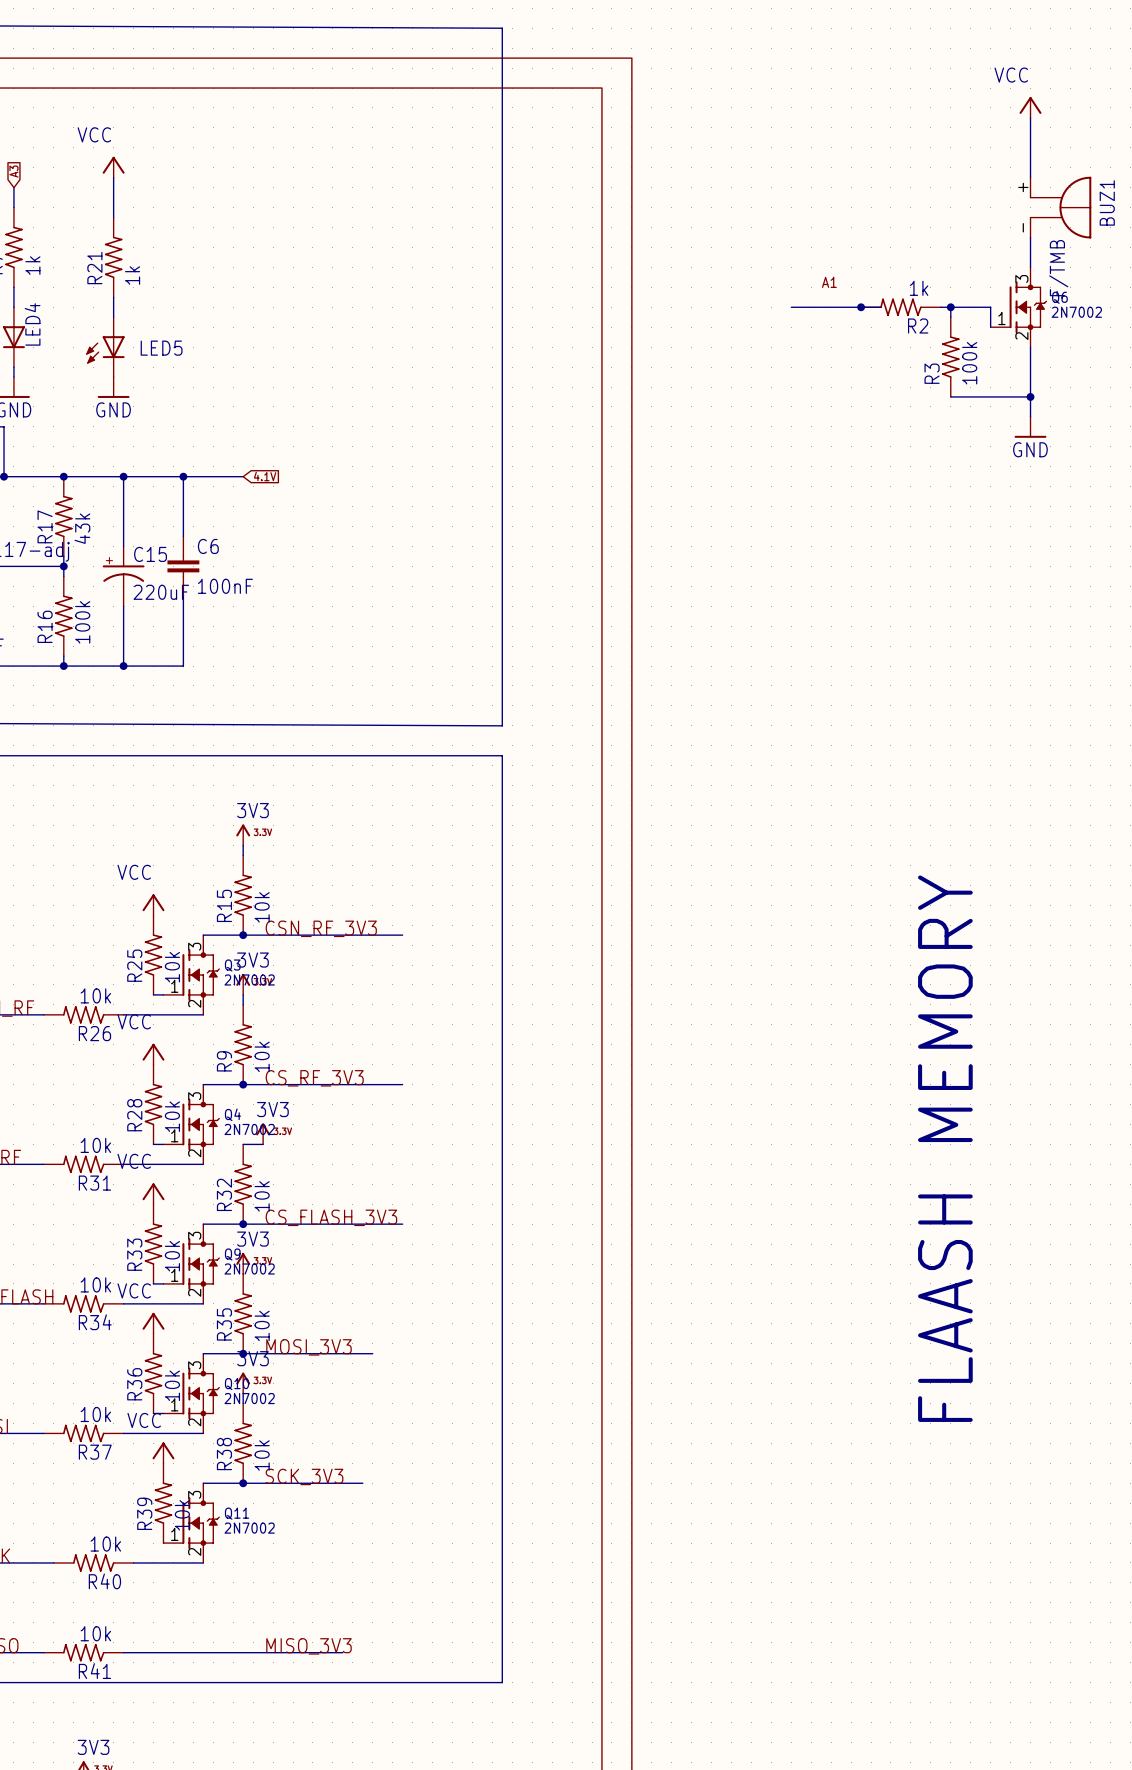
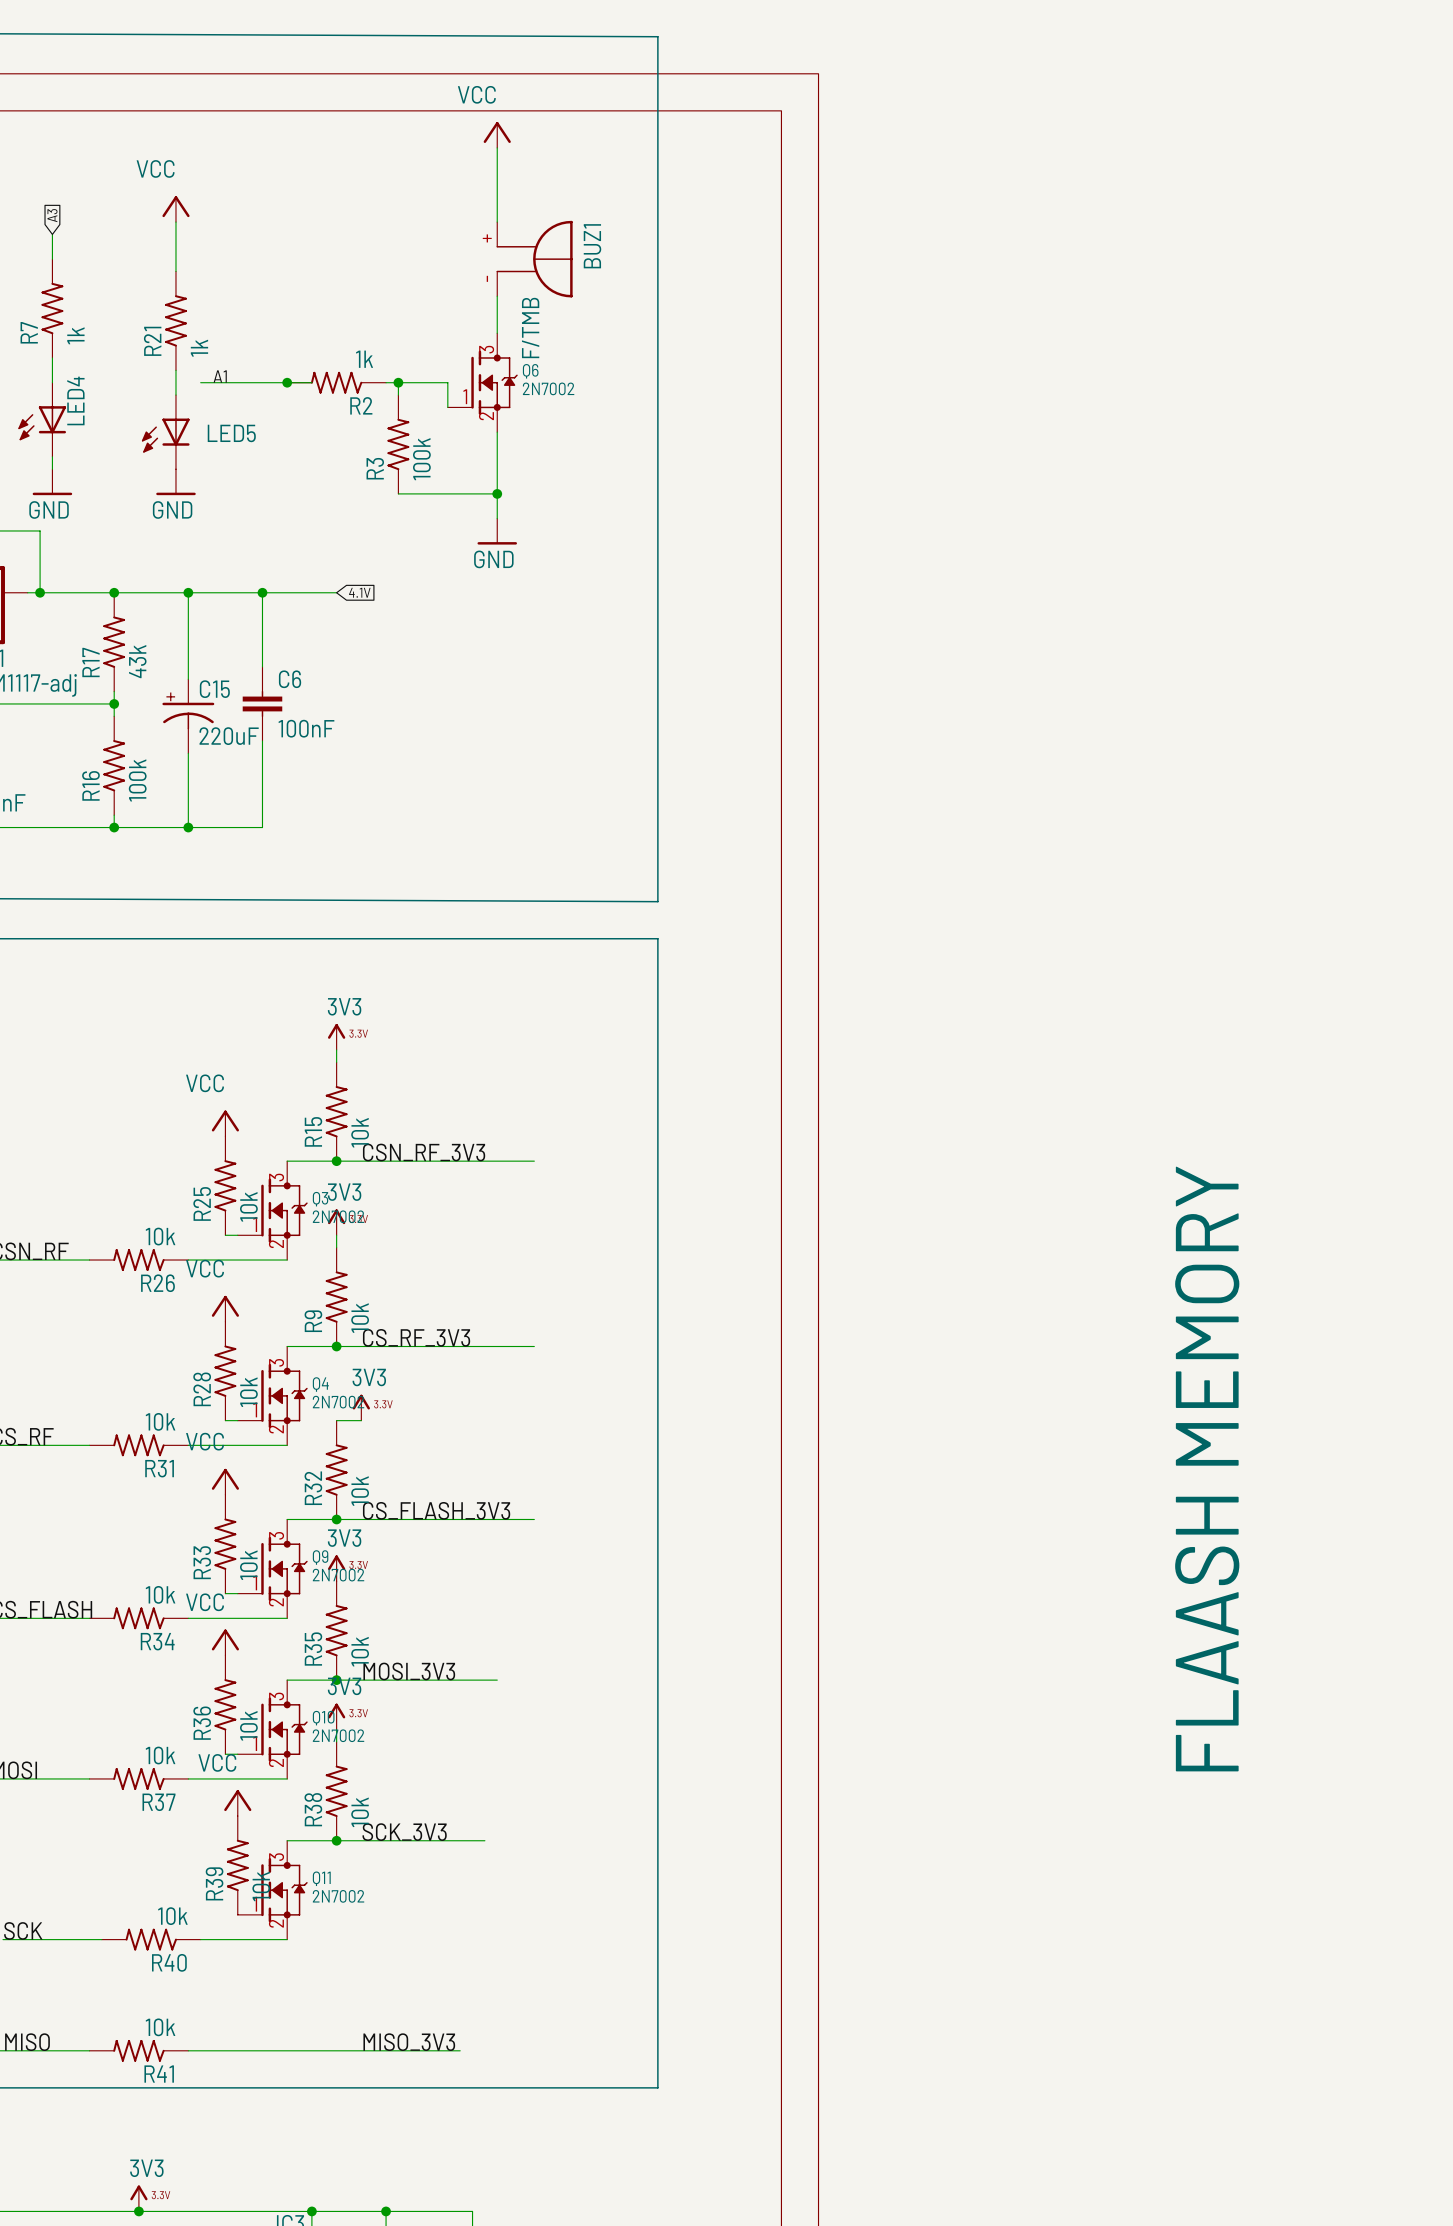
power symbol: none -> VCC (497, 134)
power symbol: VCC (1030, 107) -> none
wire: none -> (497, 147) (497, 222)
wire: (1030, 117) (1030, 177) -> none
BUZ1 position: (1060, 207) -> (534, 259)
wire: none -> (497, 296) (497, 333)
wire: (1030, 237) (1030, 267) -> none
label: A1 (829, 282) -> none
label: none -> A1 (220, 376)
wire: none -> (200, 382) (311, 382)
junction: none -> (287, 382)
wire: none -> (386, 382) (447, 382) (447, 407)
wire: none -> (398, 382) (398, 395)
junction: none -> (398, 382)
wire: (791, 307) (881, 307) -> none
junction: (861, 307) -> none
R2 position: (900, 307) -> (336, 382)
wire: (940, 307) (990, 307) (990, 327) -> none
wire: (950, 307) (950, 317) -> none
junction: (950, 307) -> none
Q6 position: (1018, 307) -> (482, 382)
wire: none -> (497, 432) (497, 518)
wire: (1030, 347) (1030, 416) -> none
R3 position: (950, 357) -> (398, 444)
wire: none -> (398, 493) (497, 493)
junction: none -> (497, 493)
wire: (950, 396) (1030, 396) -> none
junction: (1030, 396) -> none
power symbol: none -> GND (497, 531)
power symbol: GND (1030, 427) -> none

